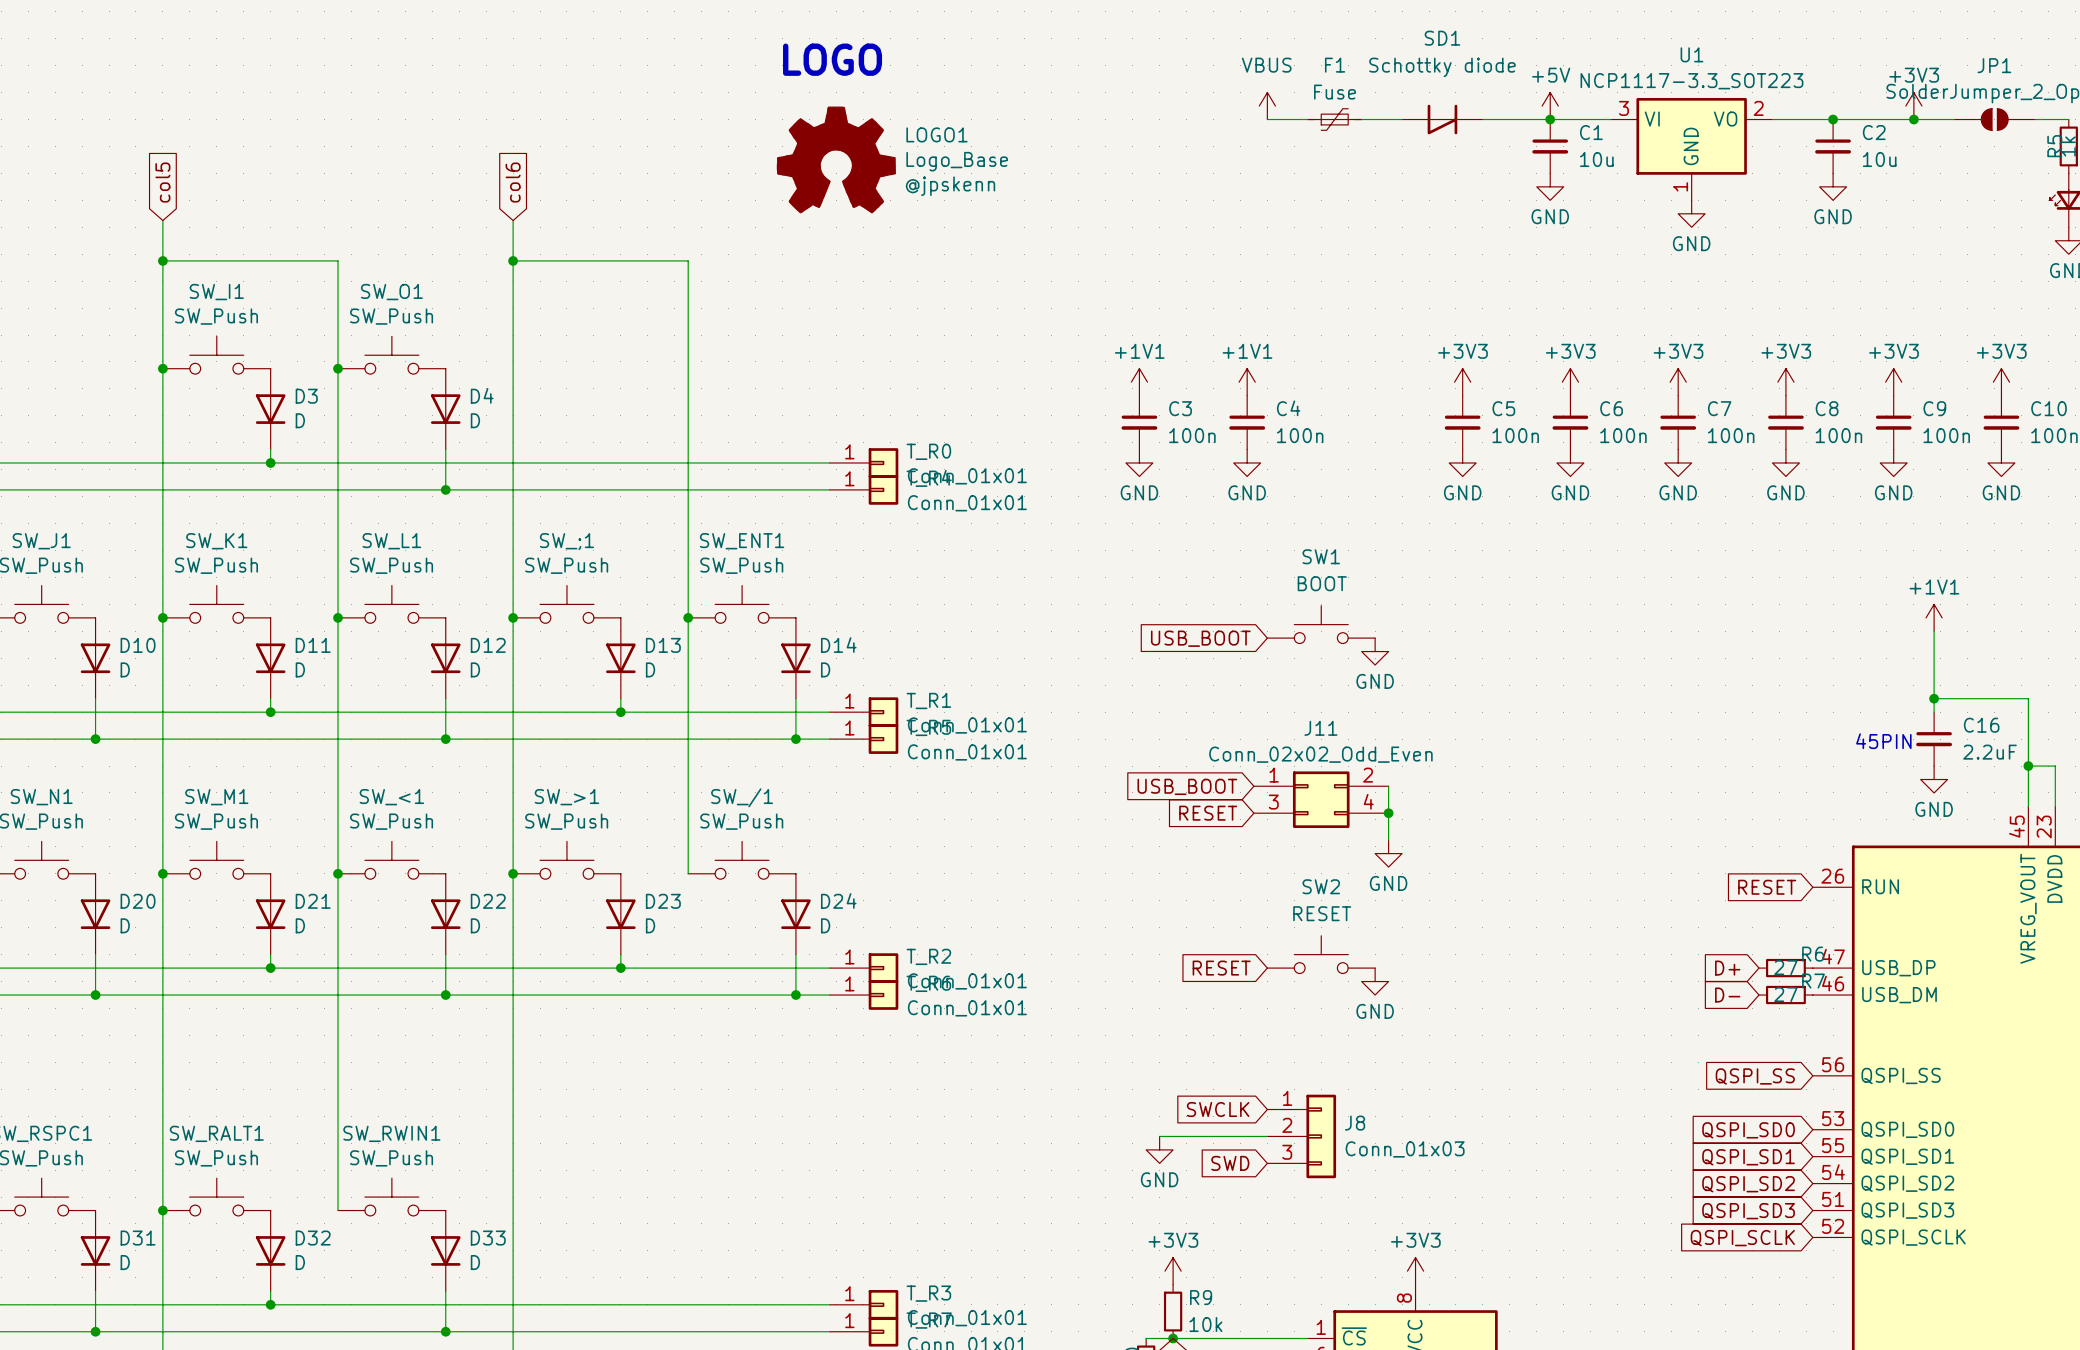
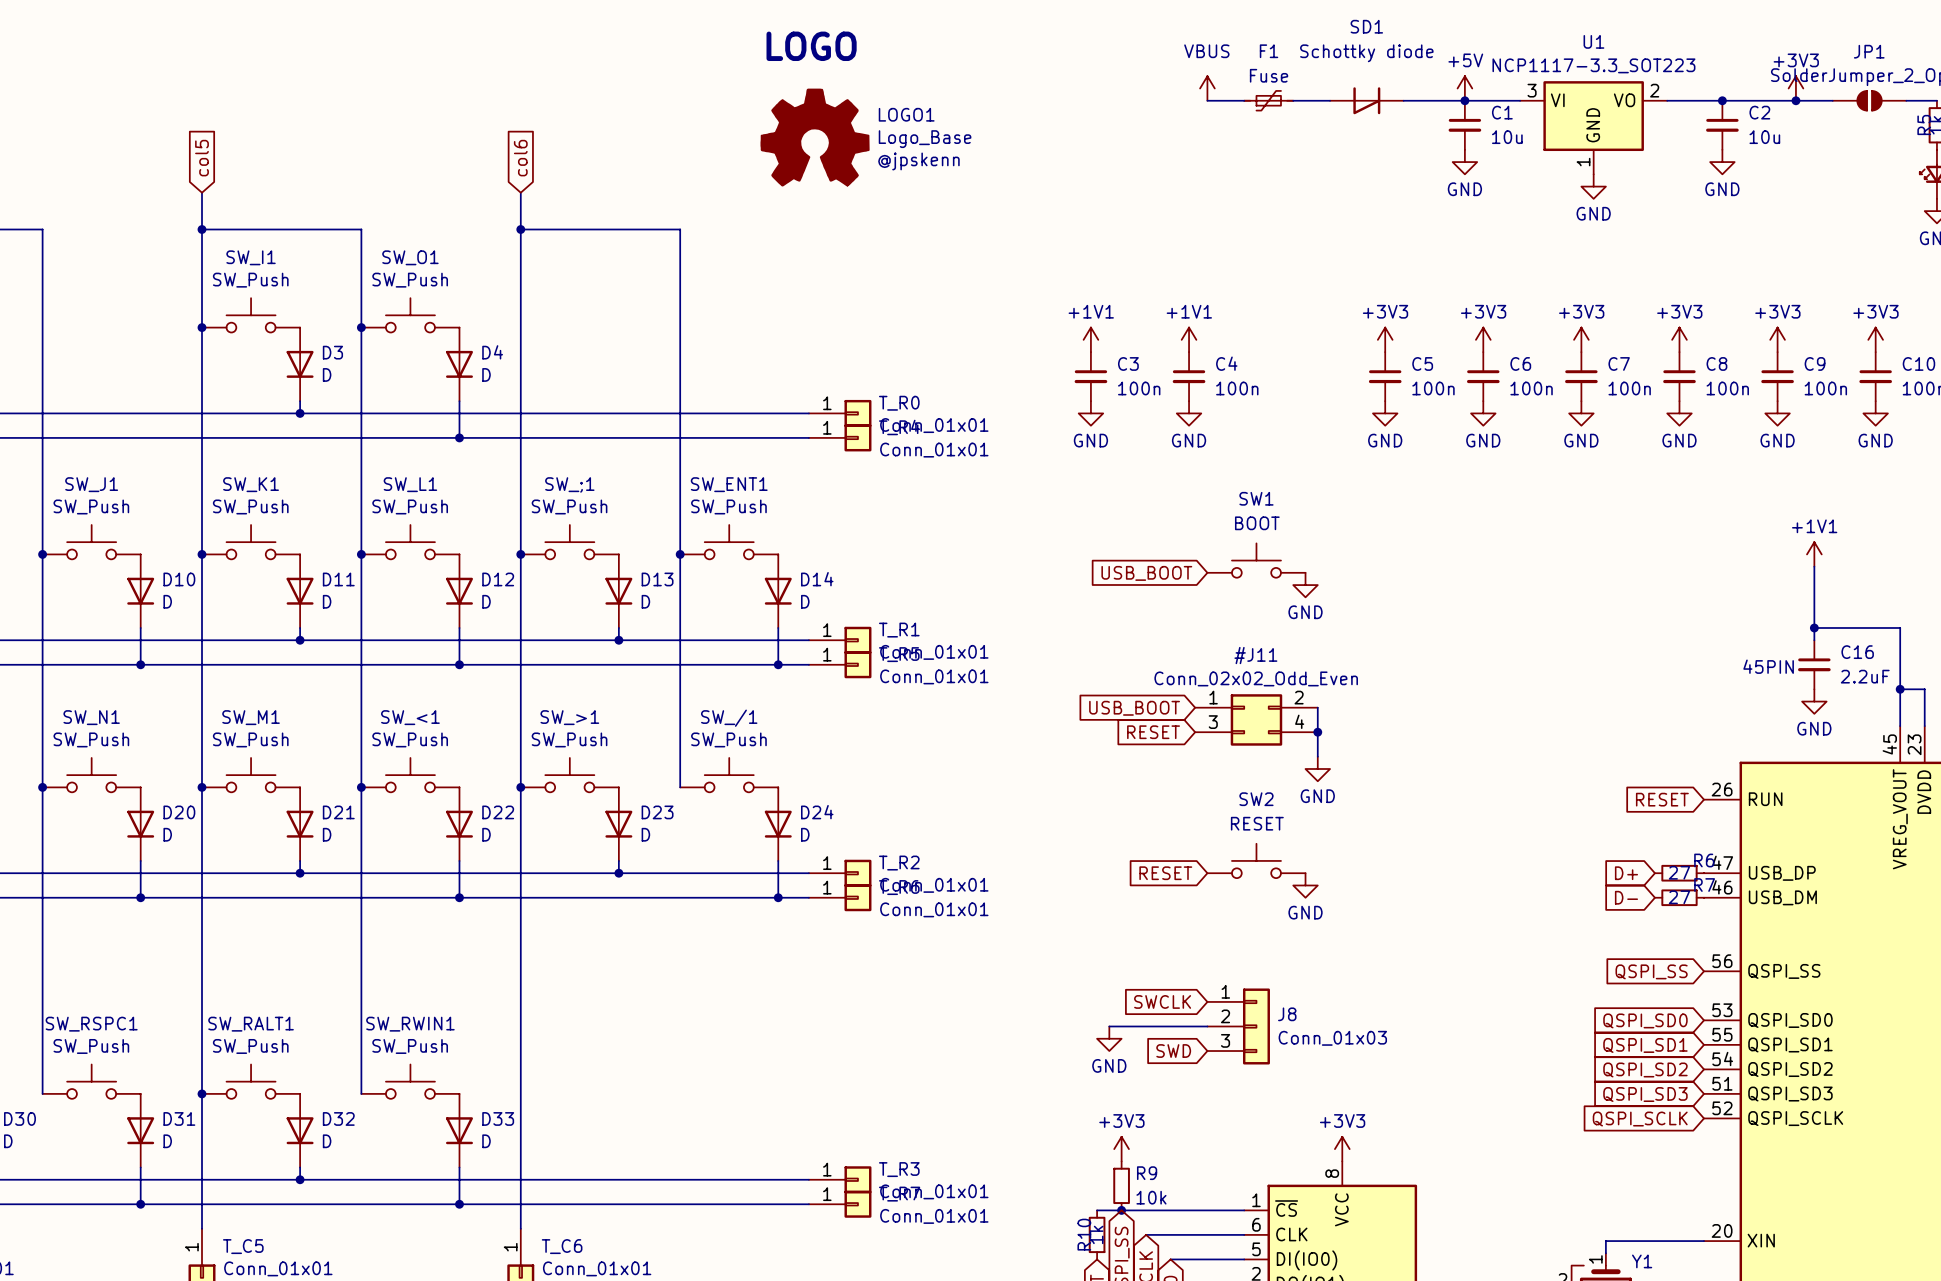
J11: Conn_02x02_Odd_Even (1321, 799) -> none
#J11: none -> Conn_02x02_Odd_Even (1256, 719)

